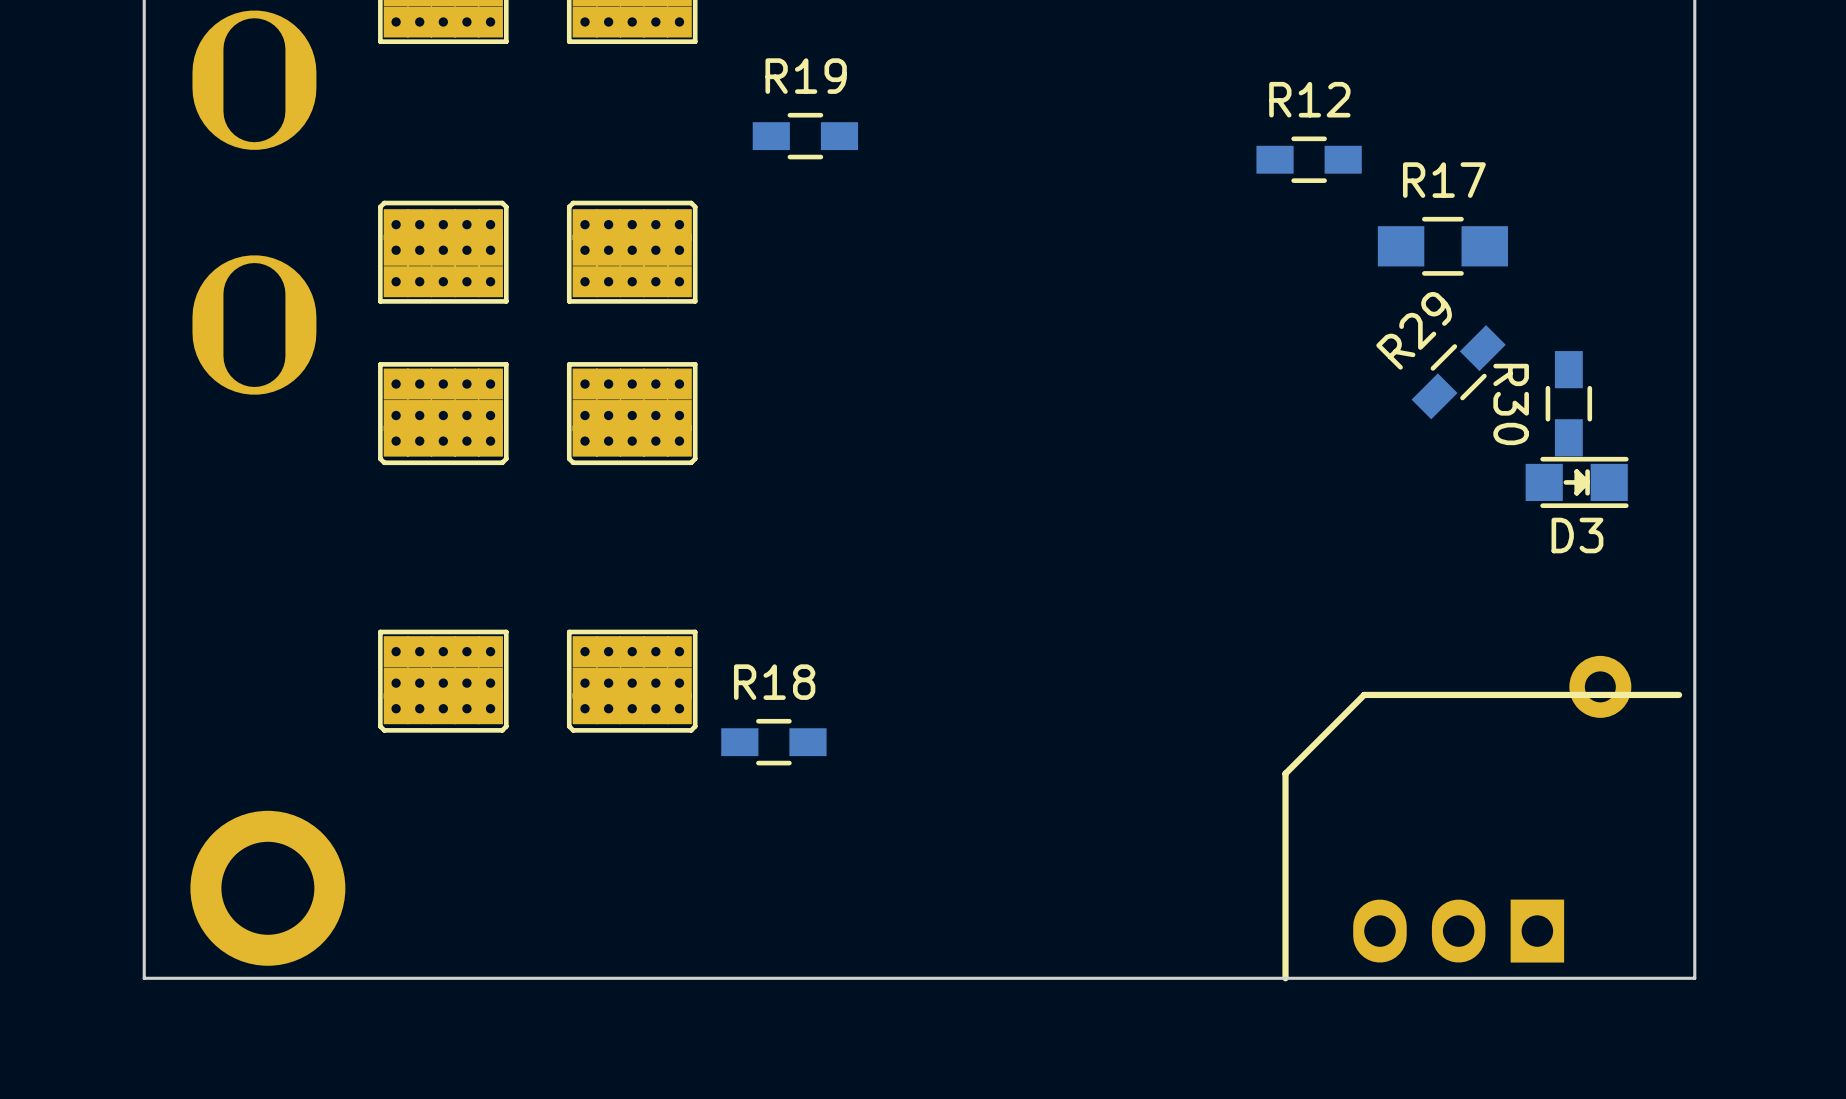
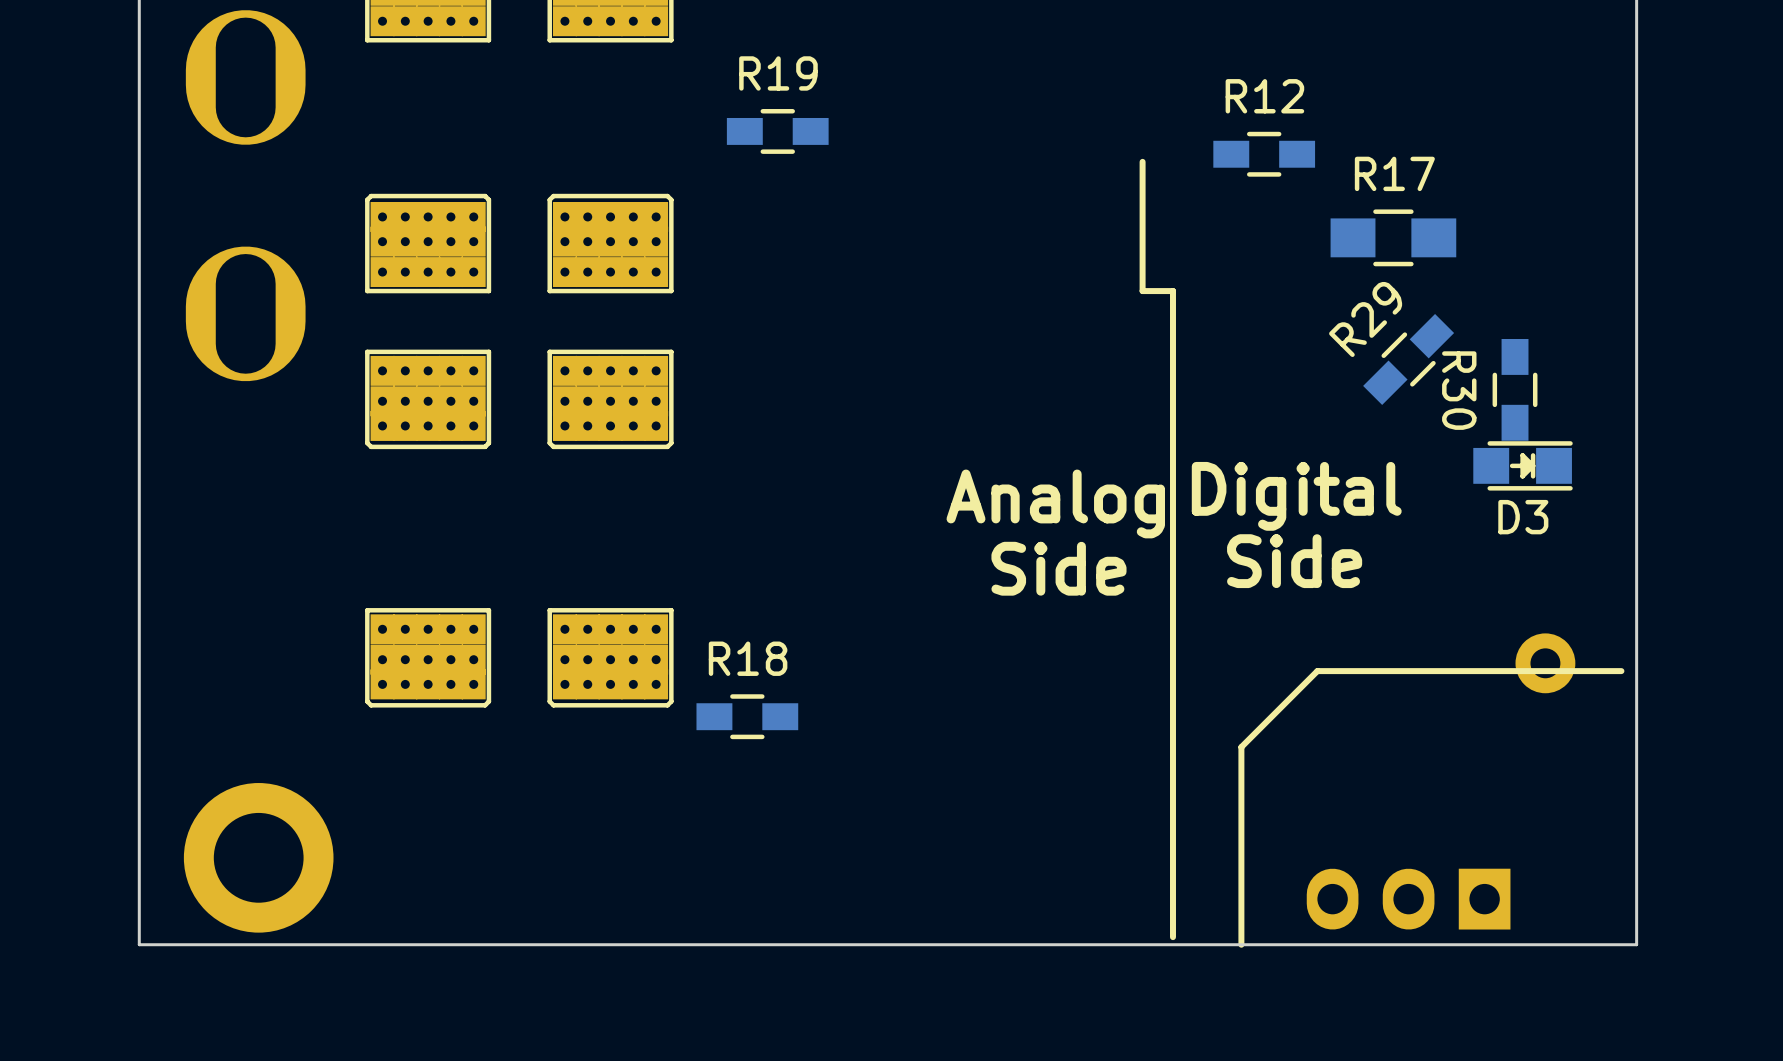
line: none -> (1142, 161) (1142, 291) (1172, 291) (1172, 937)
text: none -> Digital (1296, 496)
text: none -> Analog (1055, 503)
text: none -> Side (1294, 561)
text: none -> Side (1058, 568)

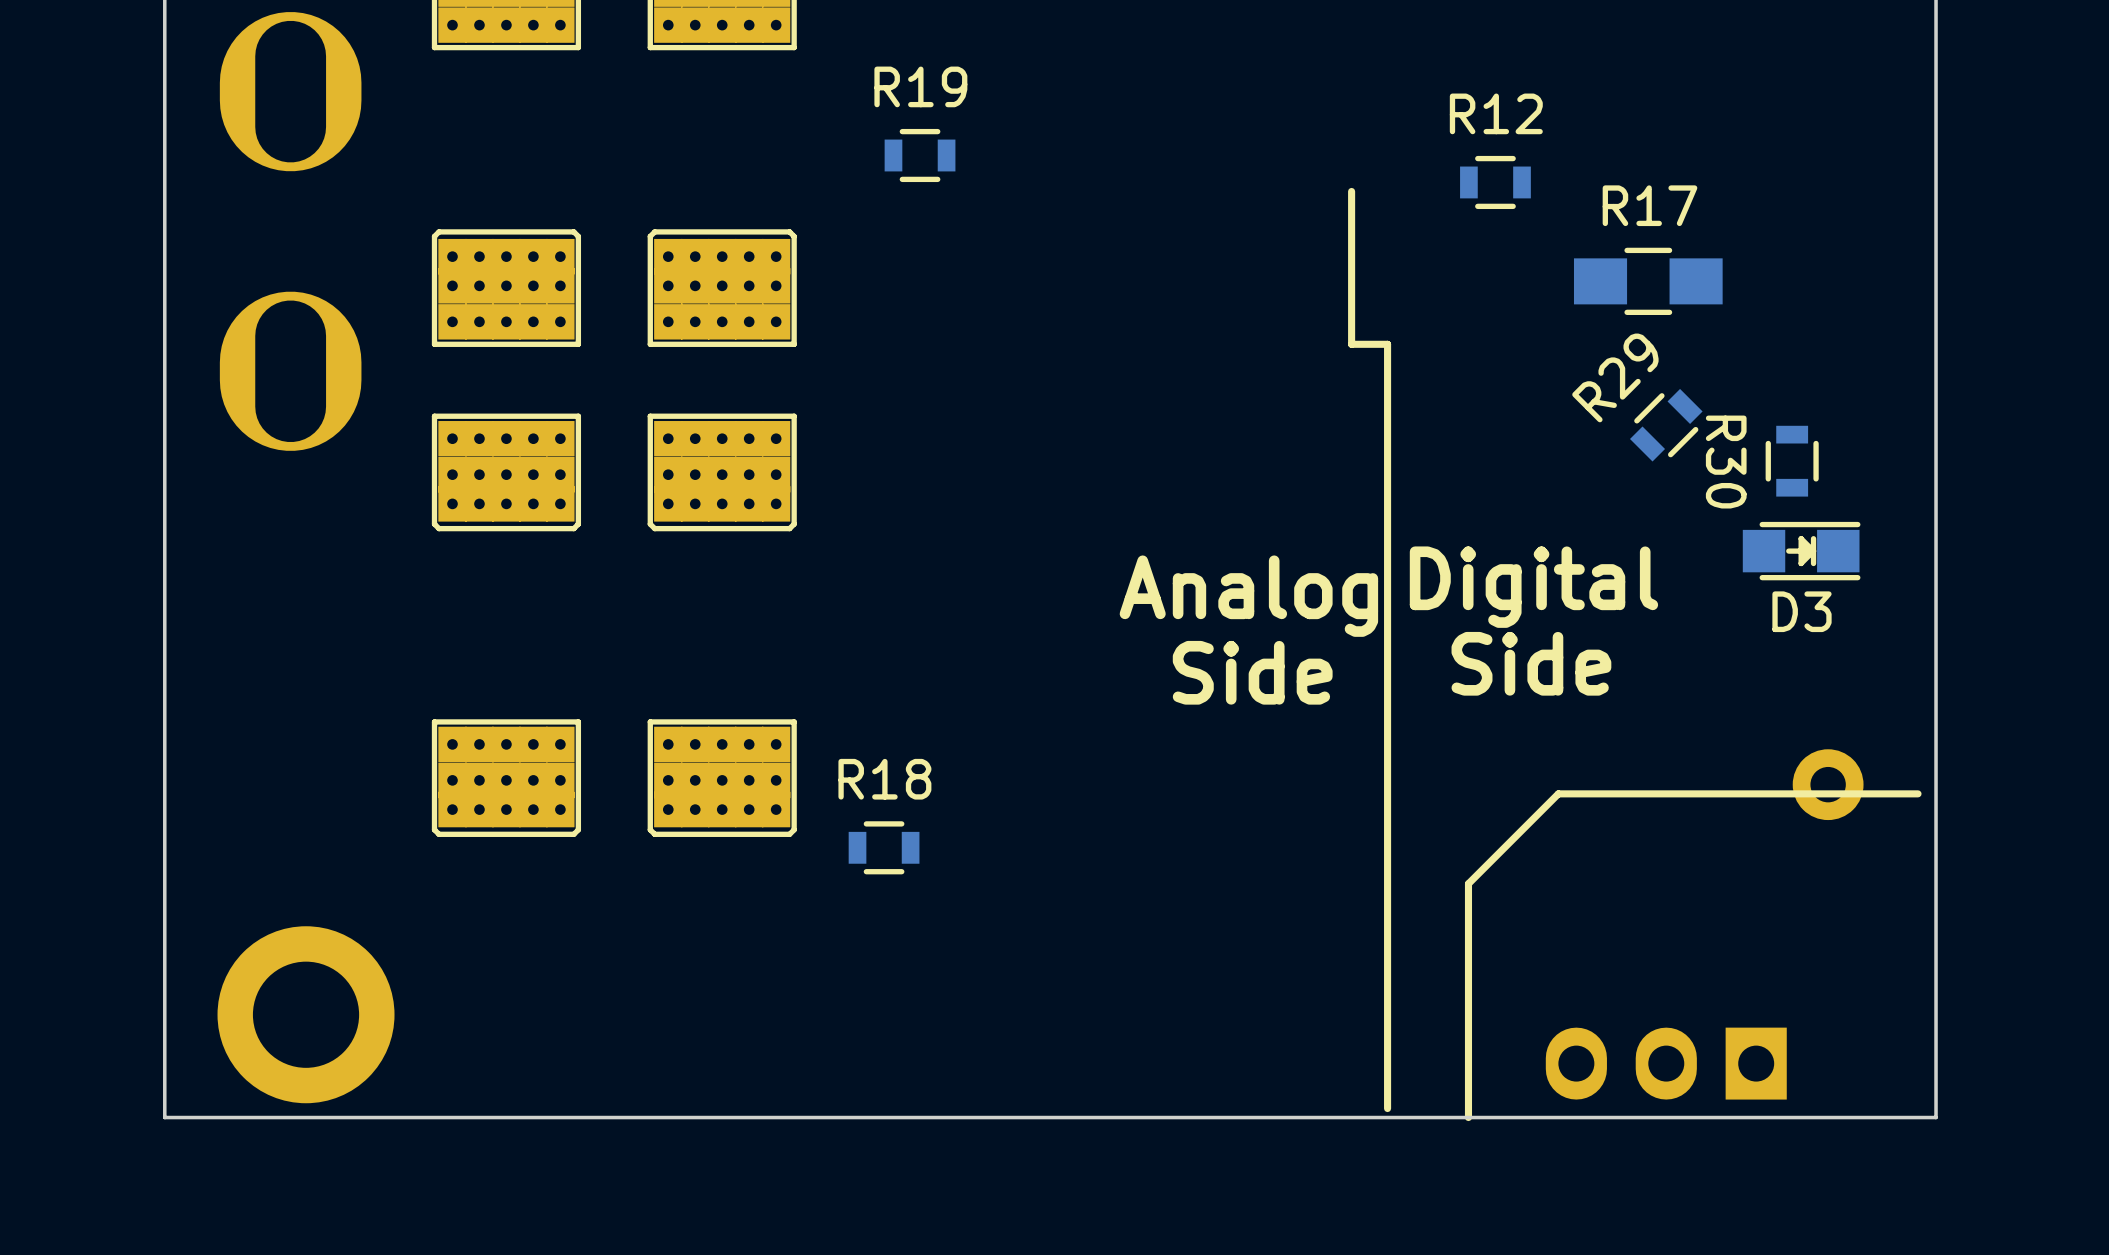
R19 footprint: [726, 109, 829, 154] -> [884, 128, 956, 183]
R12 footprint: [1213, 131, 1316, 177] -> [1460, 155, 1531, 210]
R29 footprint: [1363, 313, 1455, 405] -> [1629, 388, 1703, 462]
R30 footprint: [1492, 339, 1538, 441] -> [1765, 425, 1819, 497]
R18 footprint: [696, 694, 799, 740] -> [848, 821, 920, 875]

